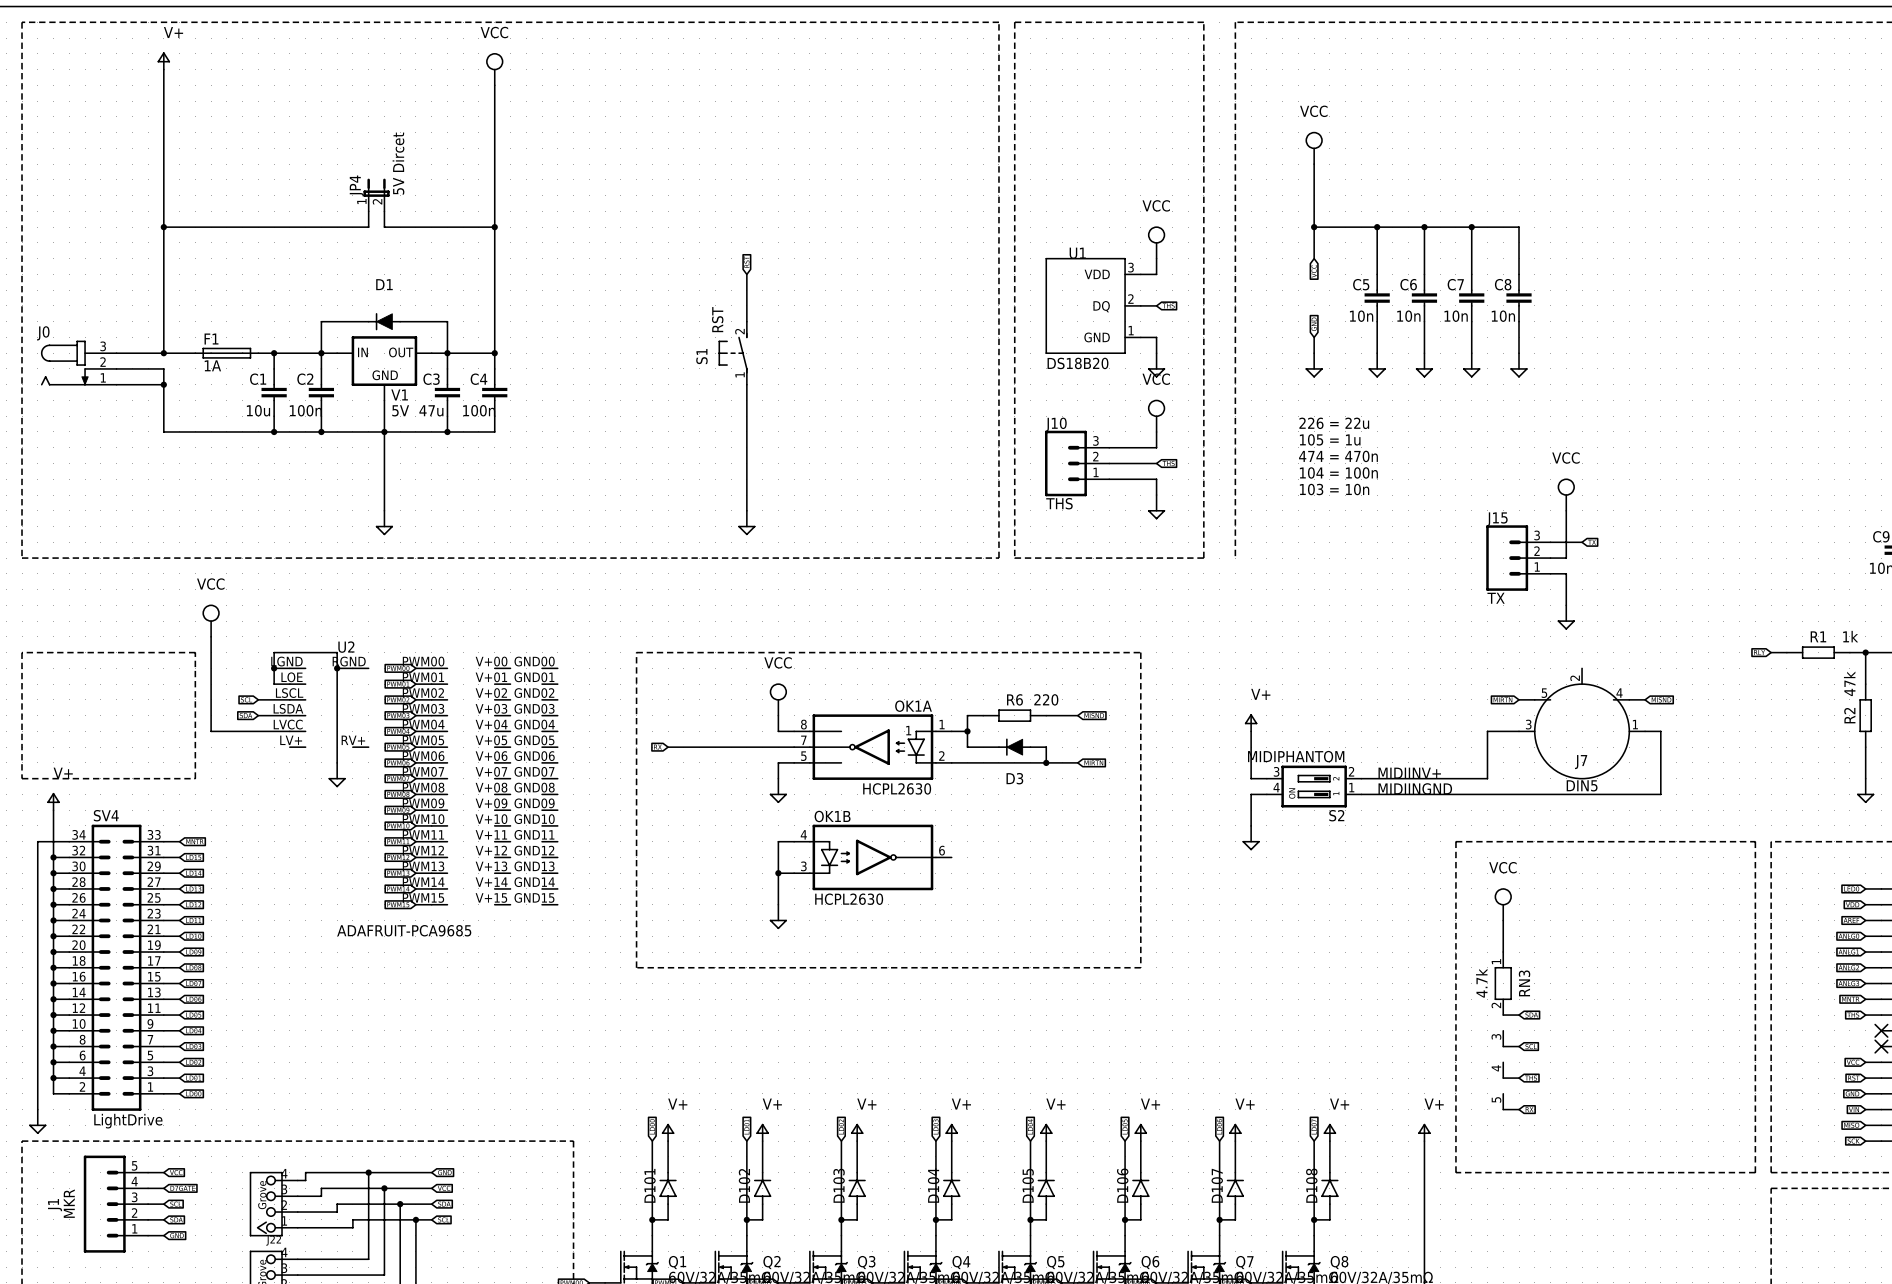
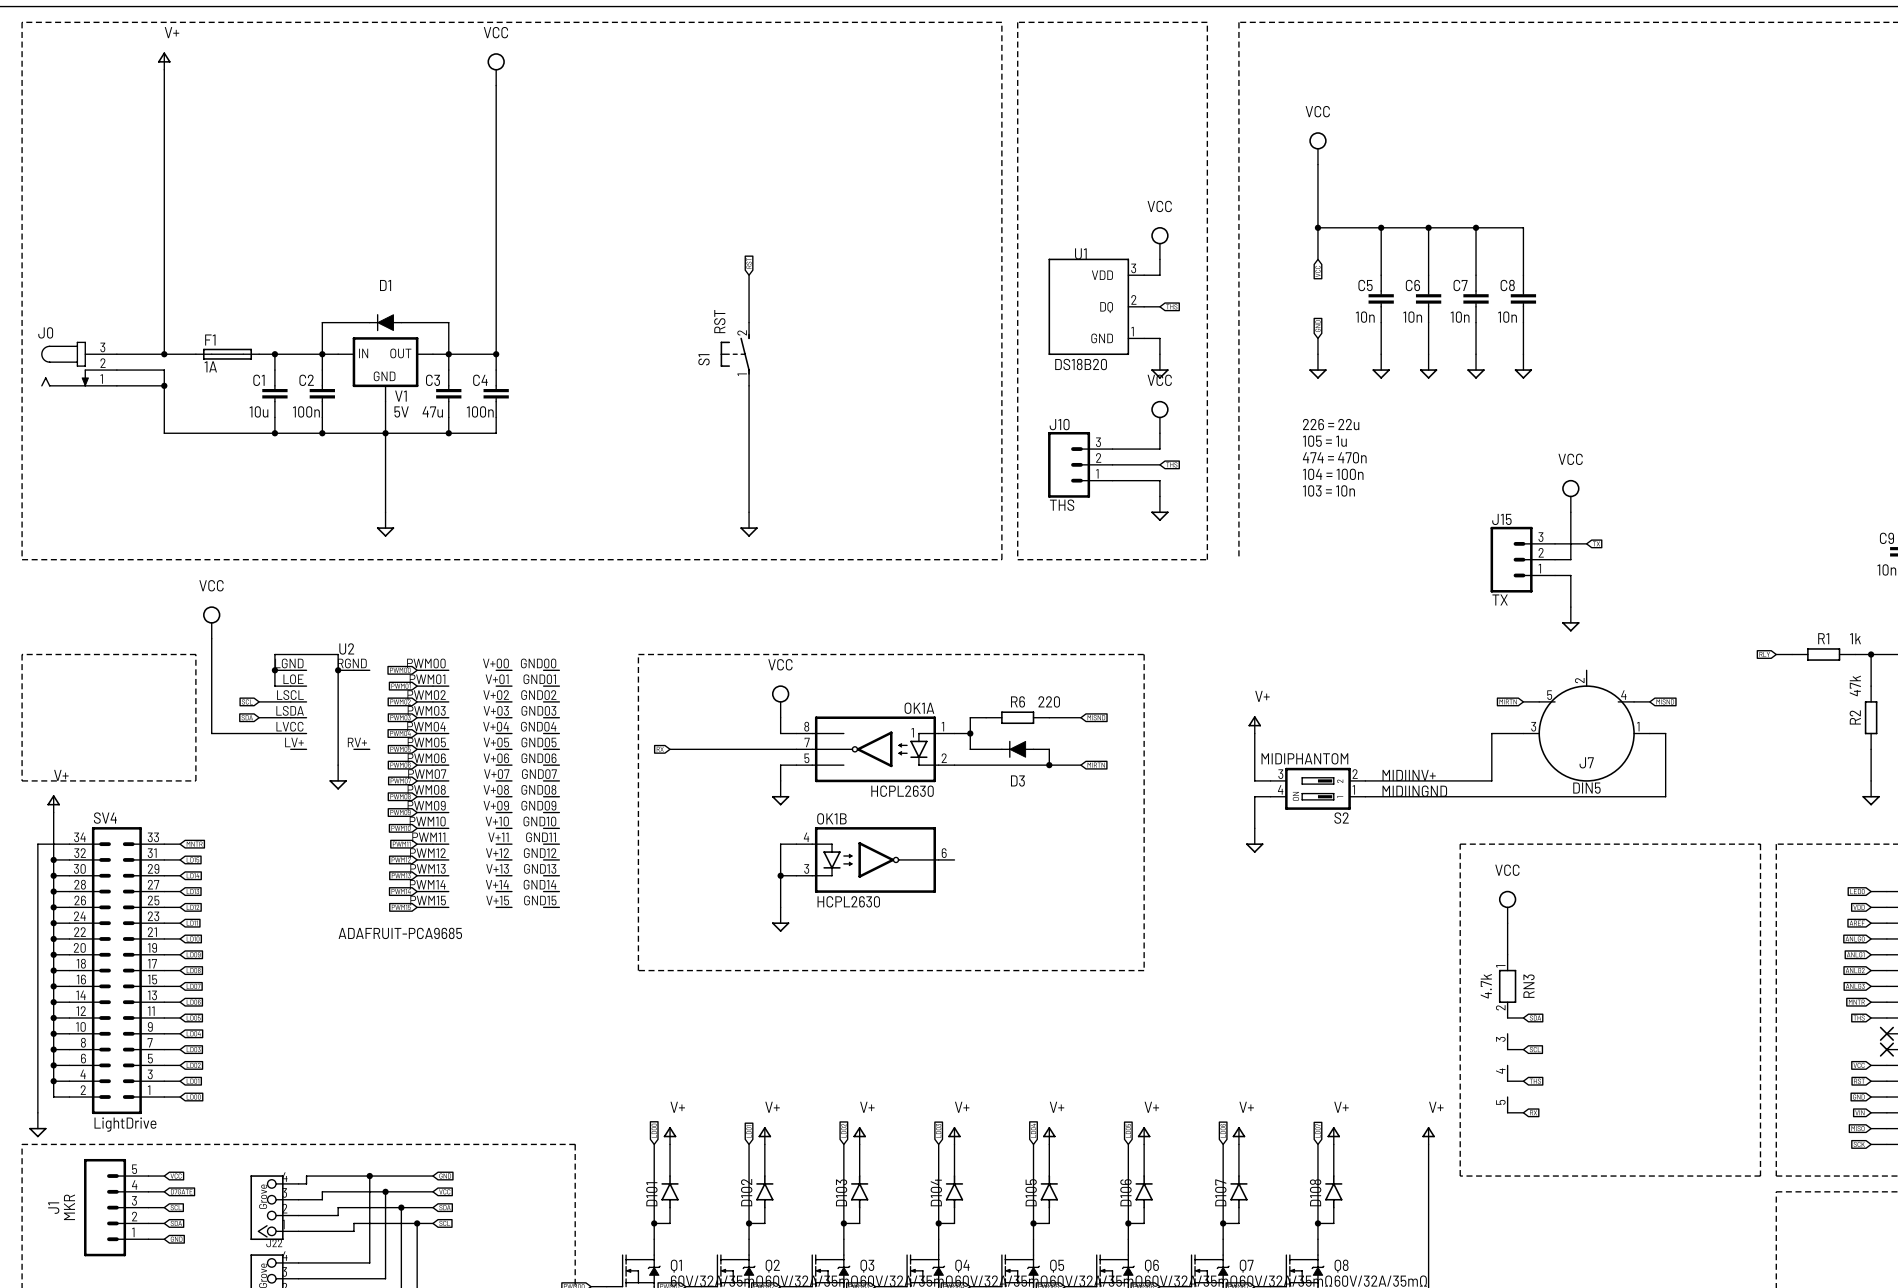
JP4: 5V Dircet (376, 194) -> none
wire: (368, 211) (368, 227) (163, 227) -> none
wire: (384, 211) (384, 227) (494, 227) -> none
junction: (163, 227) -> none
junction: (494, 227) -> none

